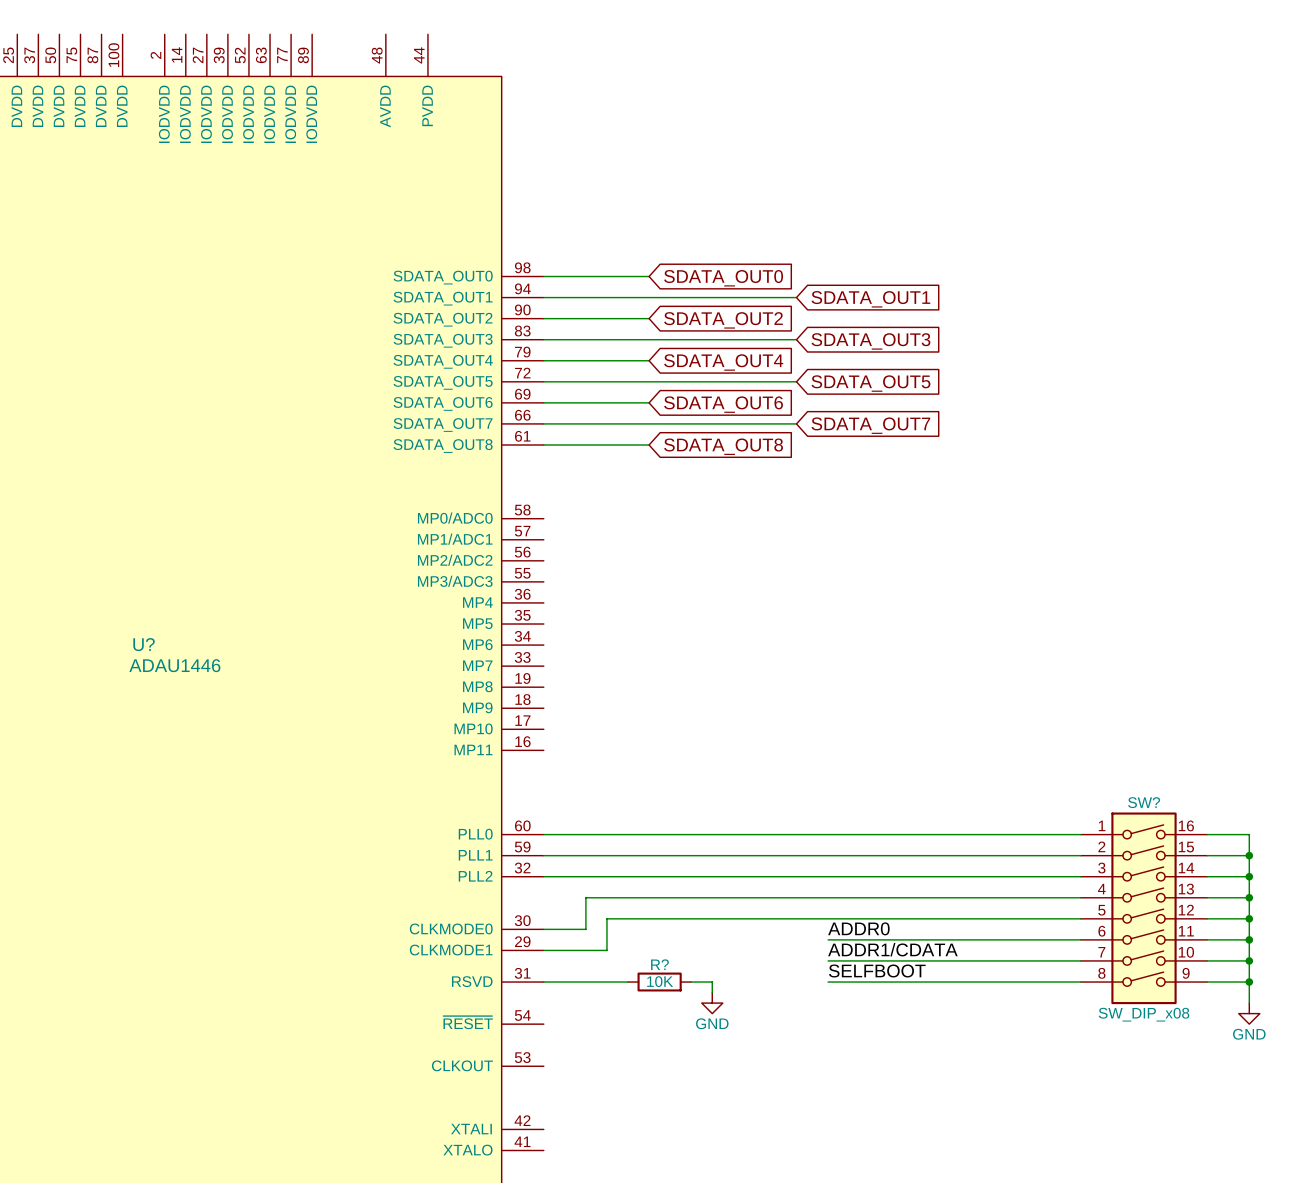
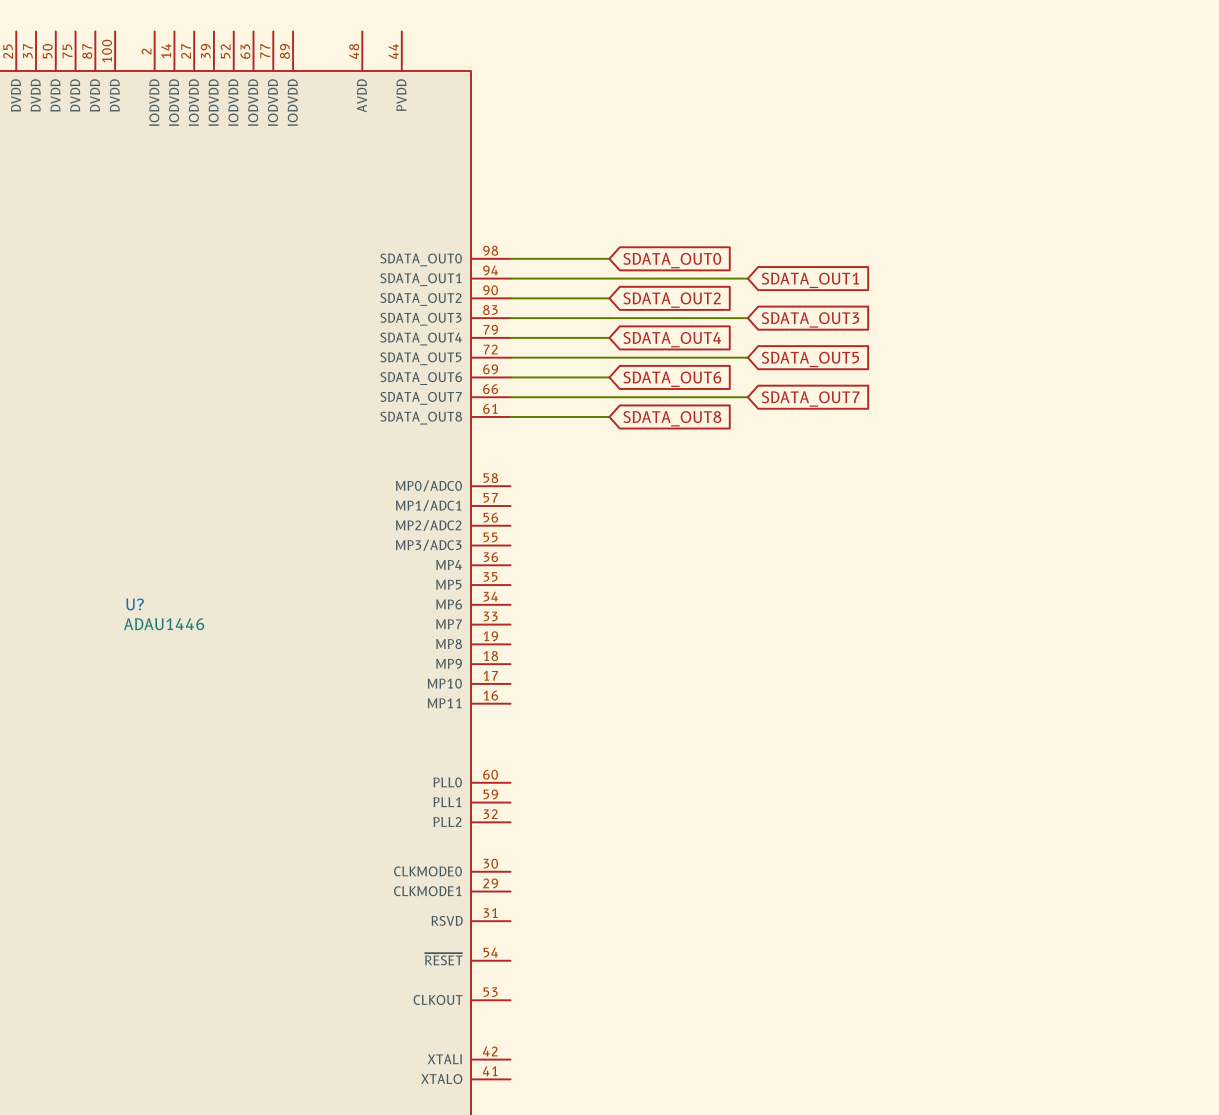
wire: (543, 834) (1080, 834) -> none
wire: (1207, 834) (1249, 834) (1249, 1003) -> none
wire: (543, 855) (1080, 855) -> none
wire: (1207, 855) (1249, 855) -> none
junction: (1249, 855) -> none
wire: (543, 876) (1080, 876) -> none
wire: (1207, 876) (1249, 876) -> none
junction: (1249, 876) -> none
wire: (1080, 897) (585, 897) (585, 929) (543, 929) -> none
wire: (1207, 897) (1249, 897) -> none
junction: (1249, 897) -> none
SW?: SW_DIP_x08 (1144, 908) -> none
wire: (1080, 918) (606, 918) (606, 950) (543, 950) -> none
wire: (1207, 918) (1249, 918) -> none
junction: (1249, 918) -> none
label: ADDR0 (858, 928) -> none
wire: (828, 939) (1080, 939) -> none
wire: (1207, 939) (1249, 939) -> none
junction: (1249, 939) -> none
label: ADDR1/CDATA (892, 949) -> none
wire: (828, 960) (1080, 960) -> none
wire: (1207, 960) (1249, 960) -> none
junction: (1249, 960) -> none
label: SELFBOOT (877, 970) -> none
wire: (543, 982) (628, 982) -> none
R?: 10K (659, 982) -> none
wire: (691, 982) (712, 982) (712, 992) -> none
wire: (828, 982) (1080, 982) -> none
wire: (1207, 982) (1249, 982) -> none
junction: (1249, 982) -> none
power symbol: GND (712, 1003) -> none
power symbol: GND (1249, 1013) -> none

